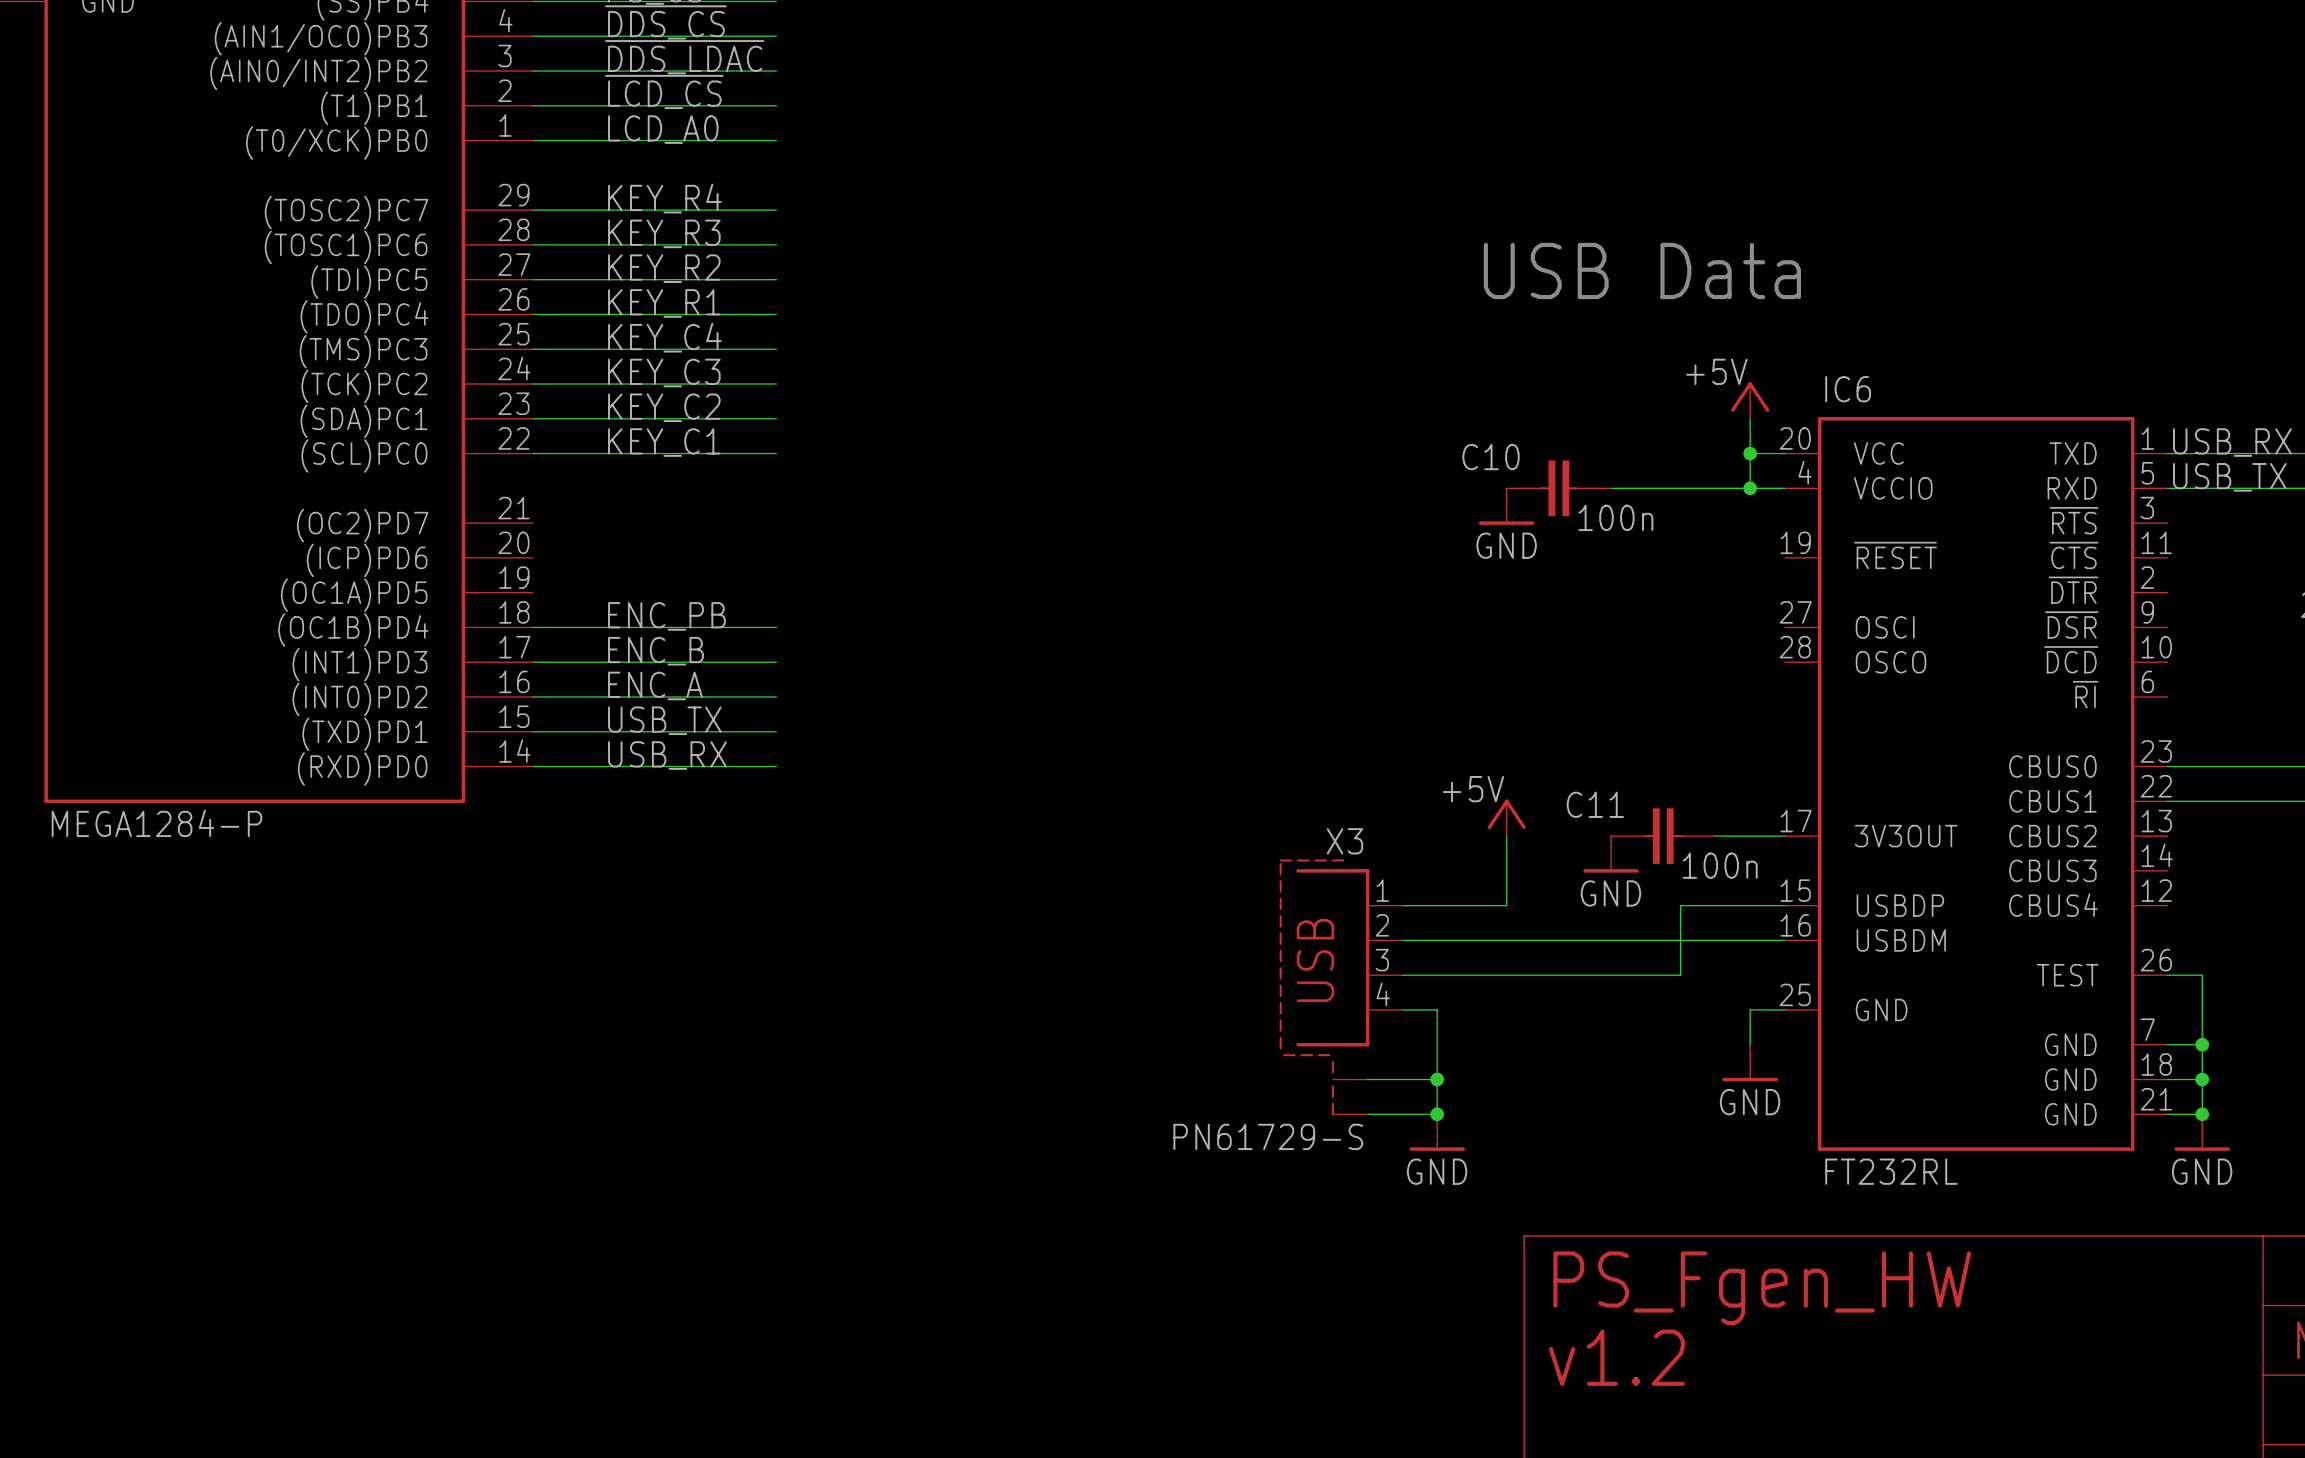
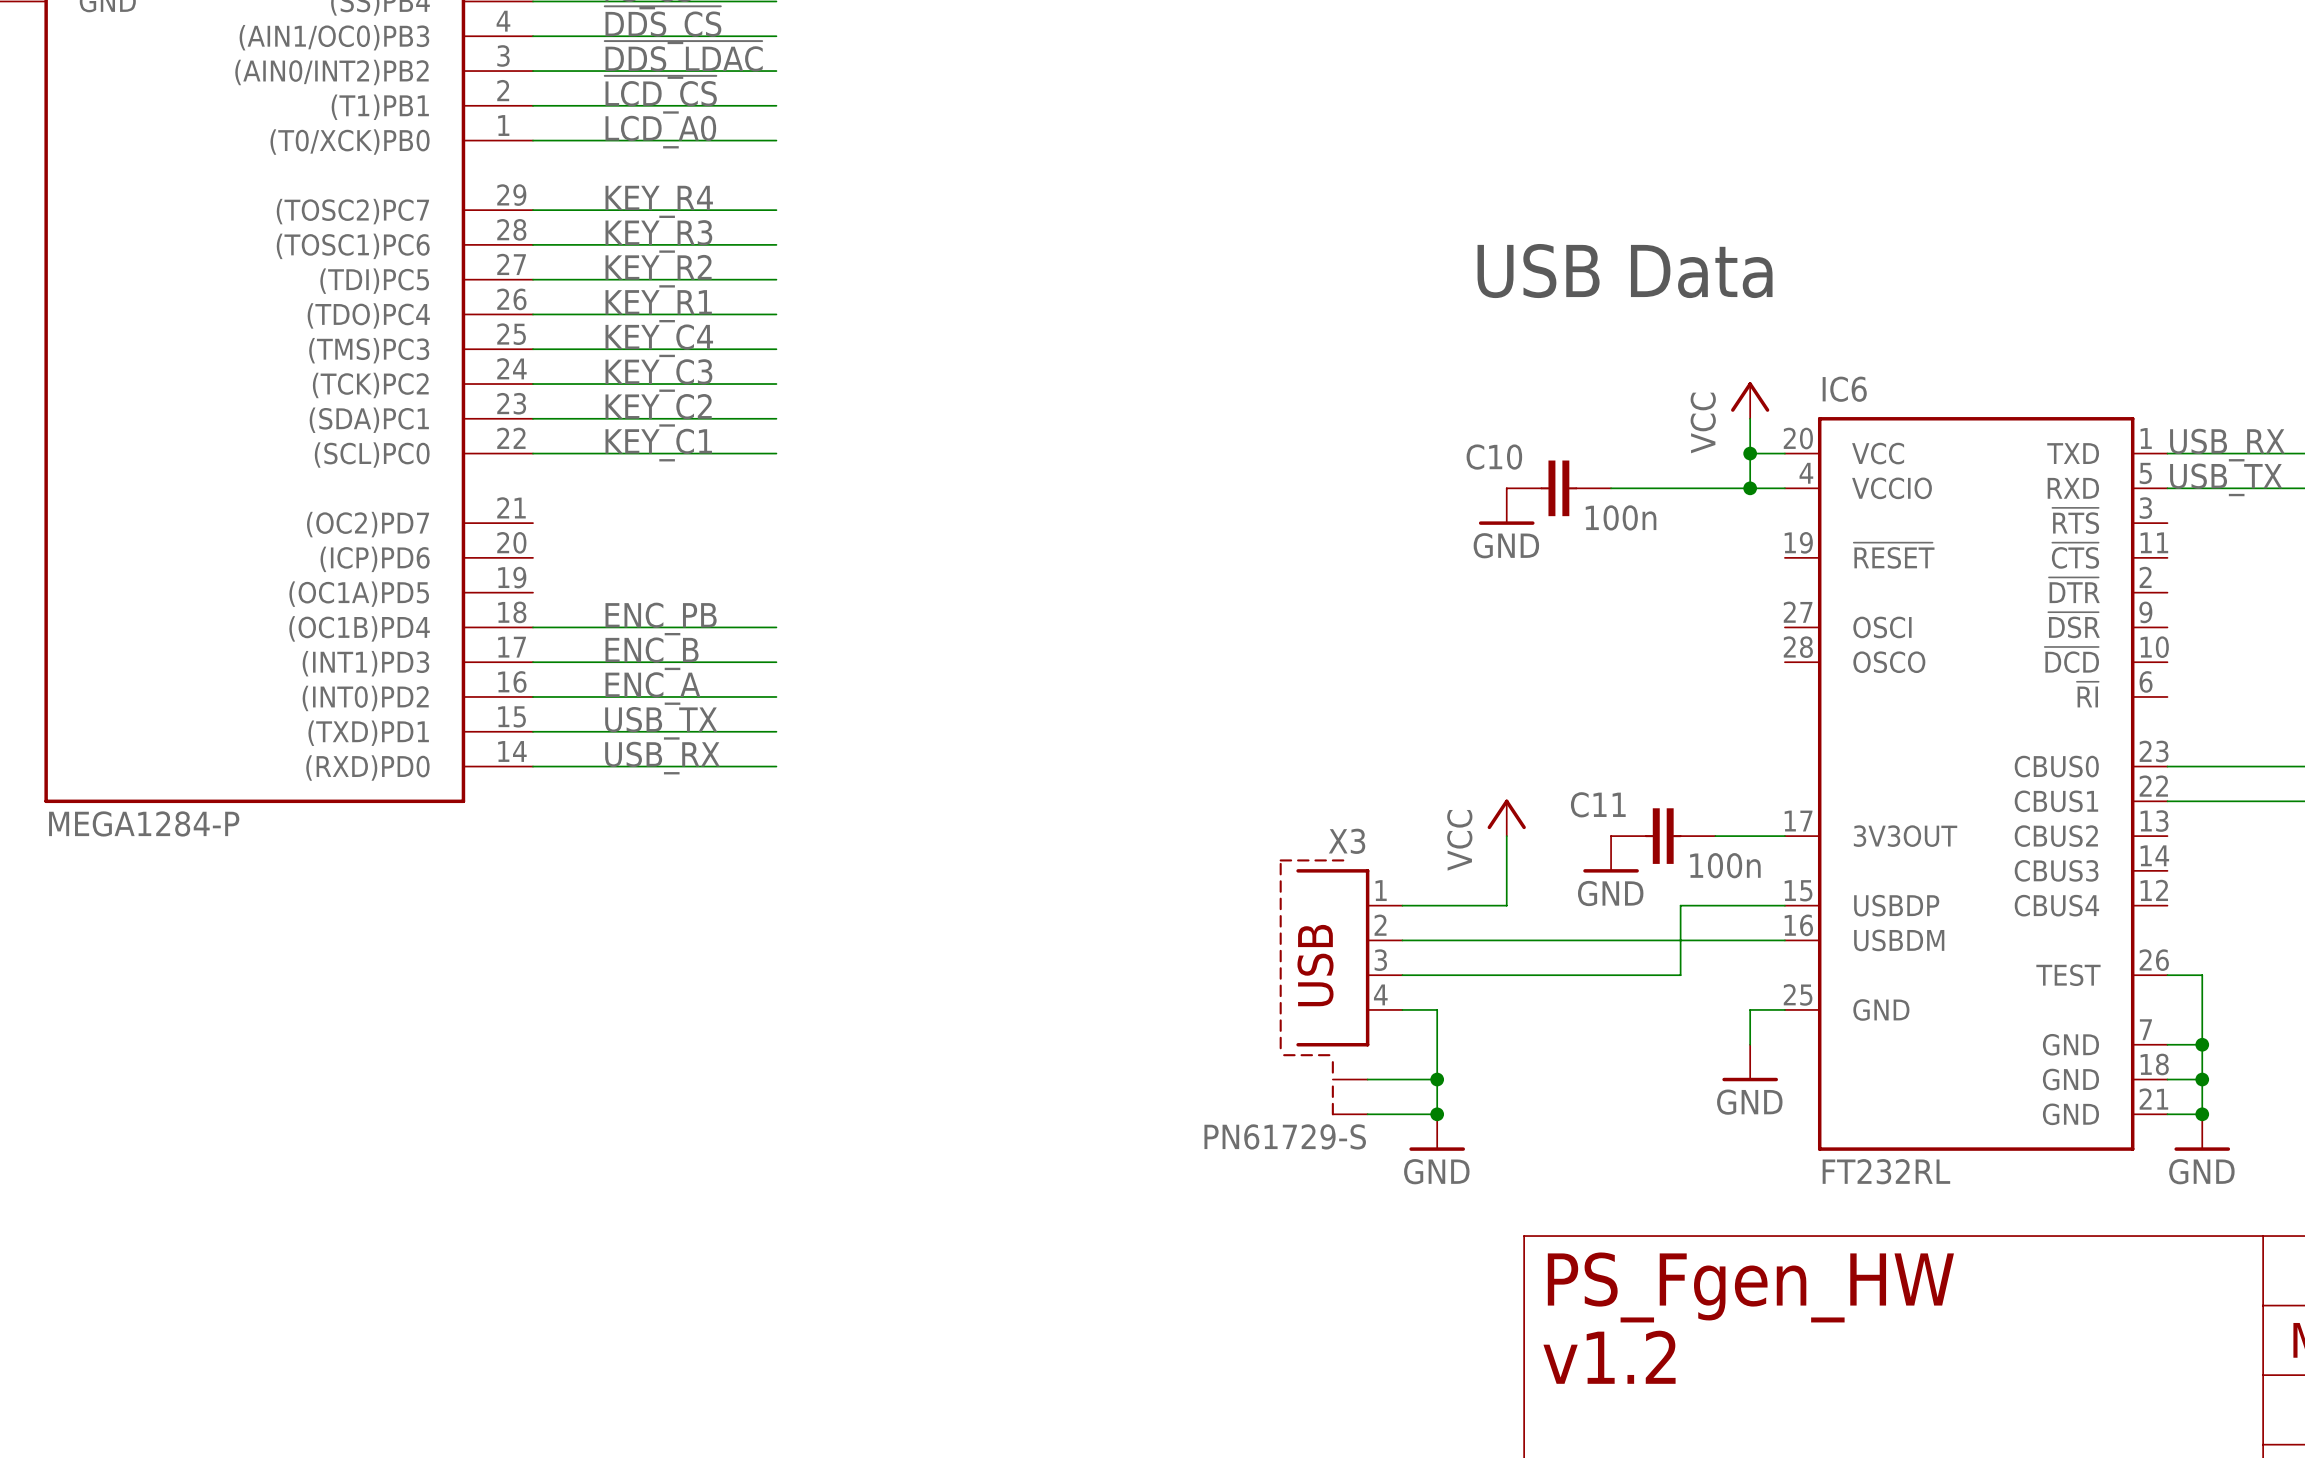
power symbol: +5V (1750, 400) -> VCC (1750, 400)
power symbol: +5V (1506, 817) -> VCC (1506, 817)

